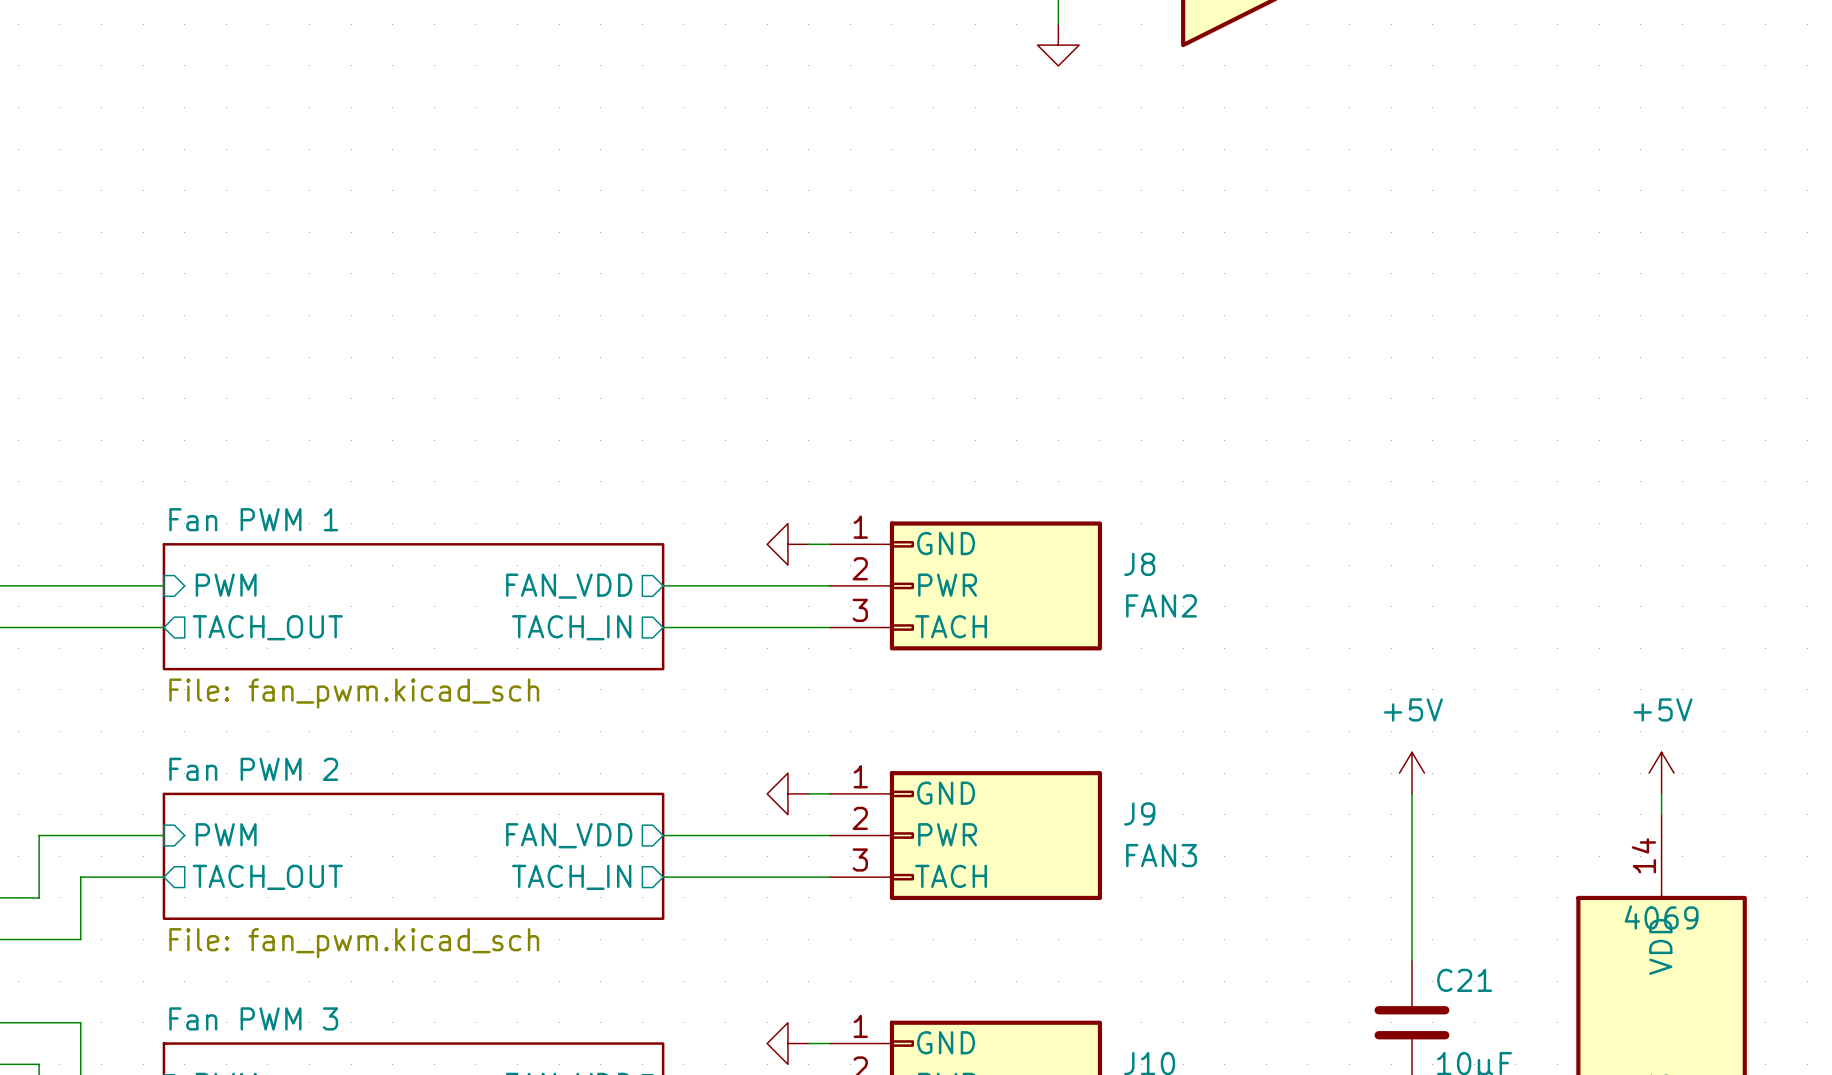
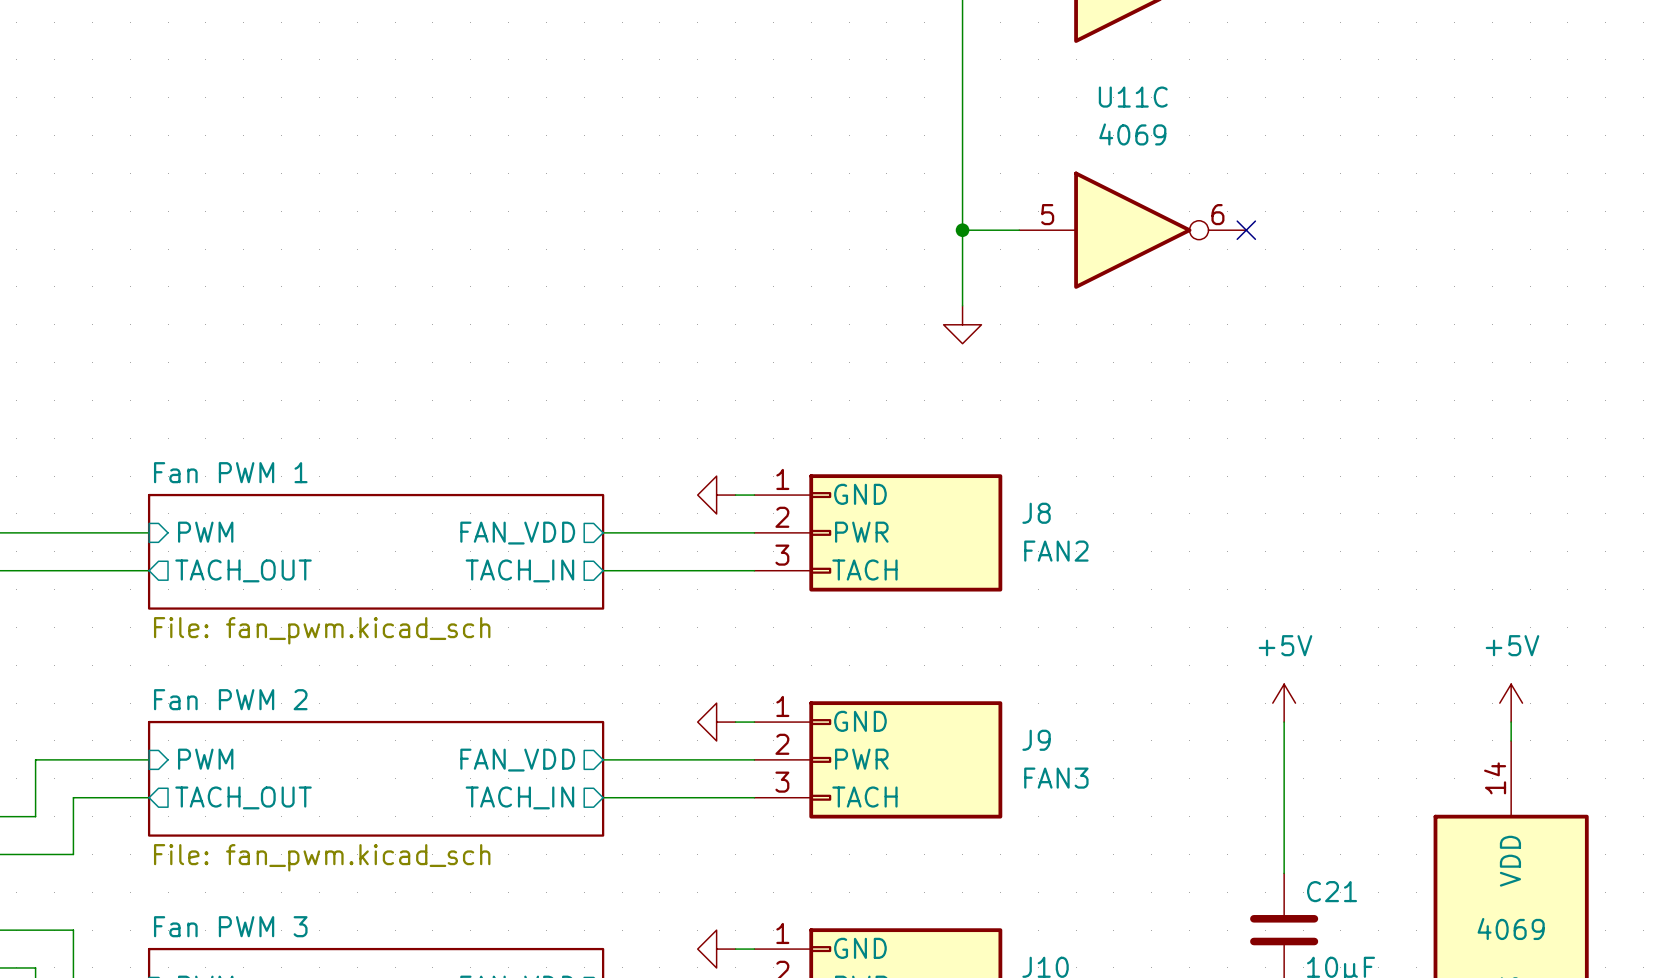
wire: none -> (962, 22) (962, 305)
power symbol position: (1058, 45) -> (962, 324)
wire: none -> (962, 230) (1019, 230)
junction: none -> (962, 230)
U11C: none -> 4069 (1132, 230)
no-connect mark: none -> (1246, 230)
part value position: 4069 (1661, 917) -> 4069 (1511, 928)

